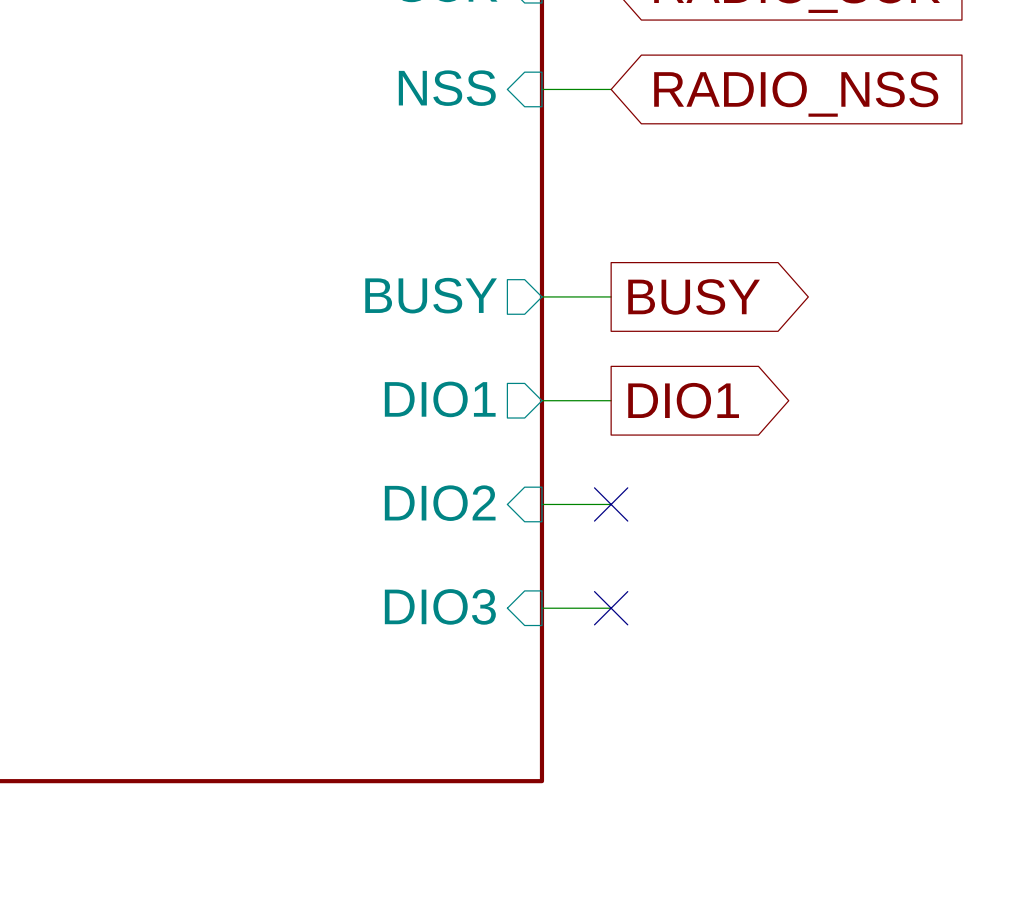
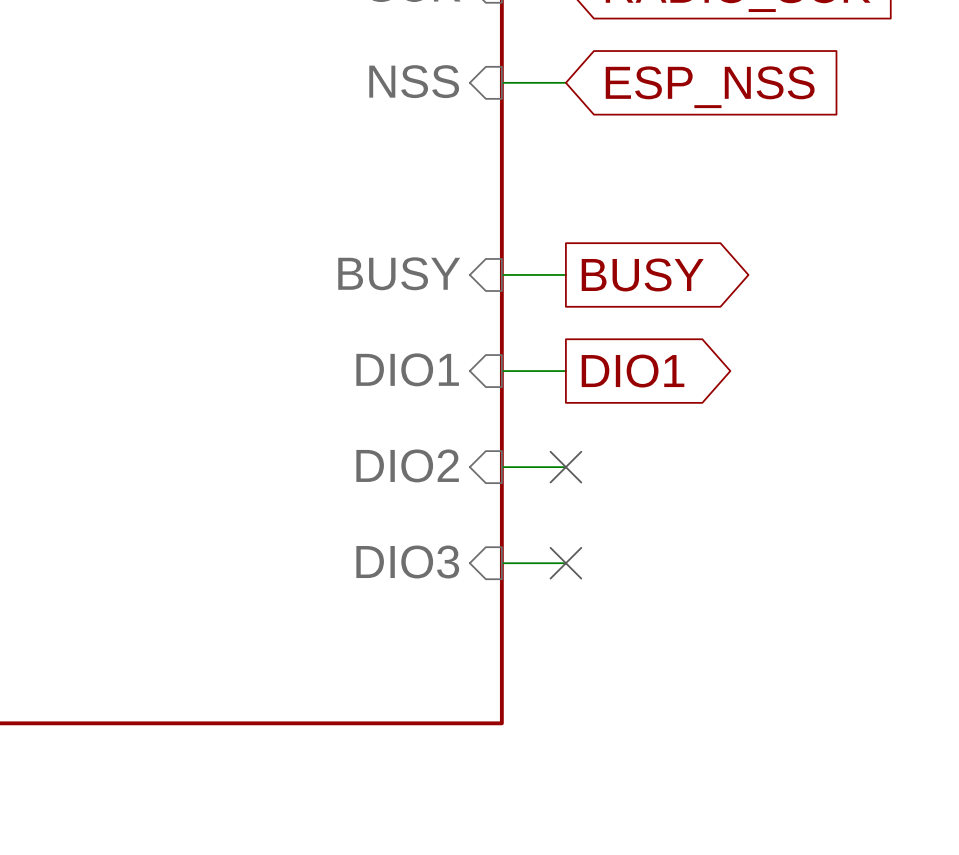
global label: RADIO_NSS (796, 94) -> ESP_NSS (710, 87)
sheet pin shape: output (431, 295) -> input (399, 273)
sheet pin shape: output (440, 399) -> input (407, 369)

